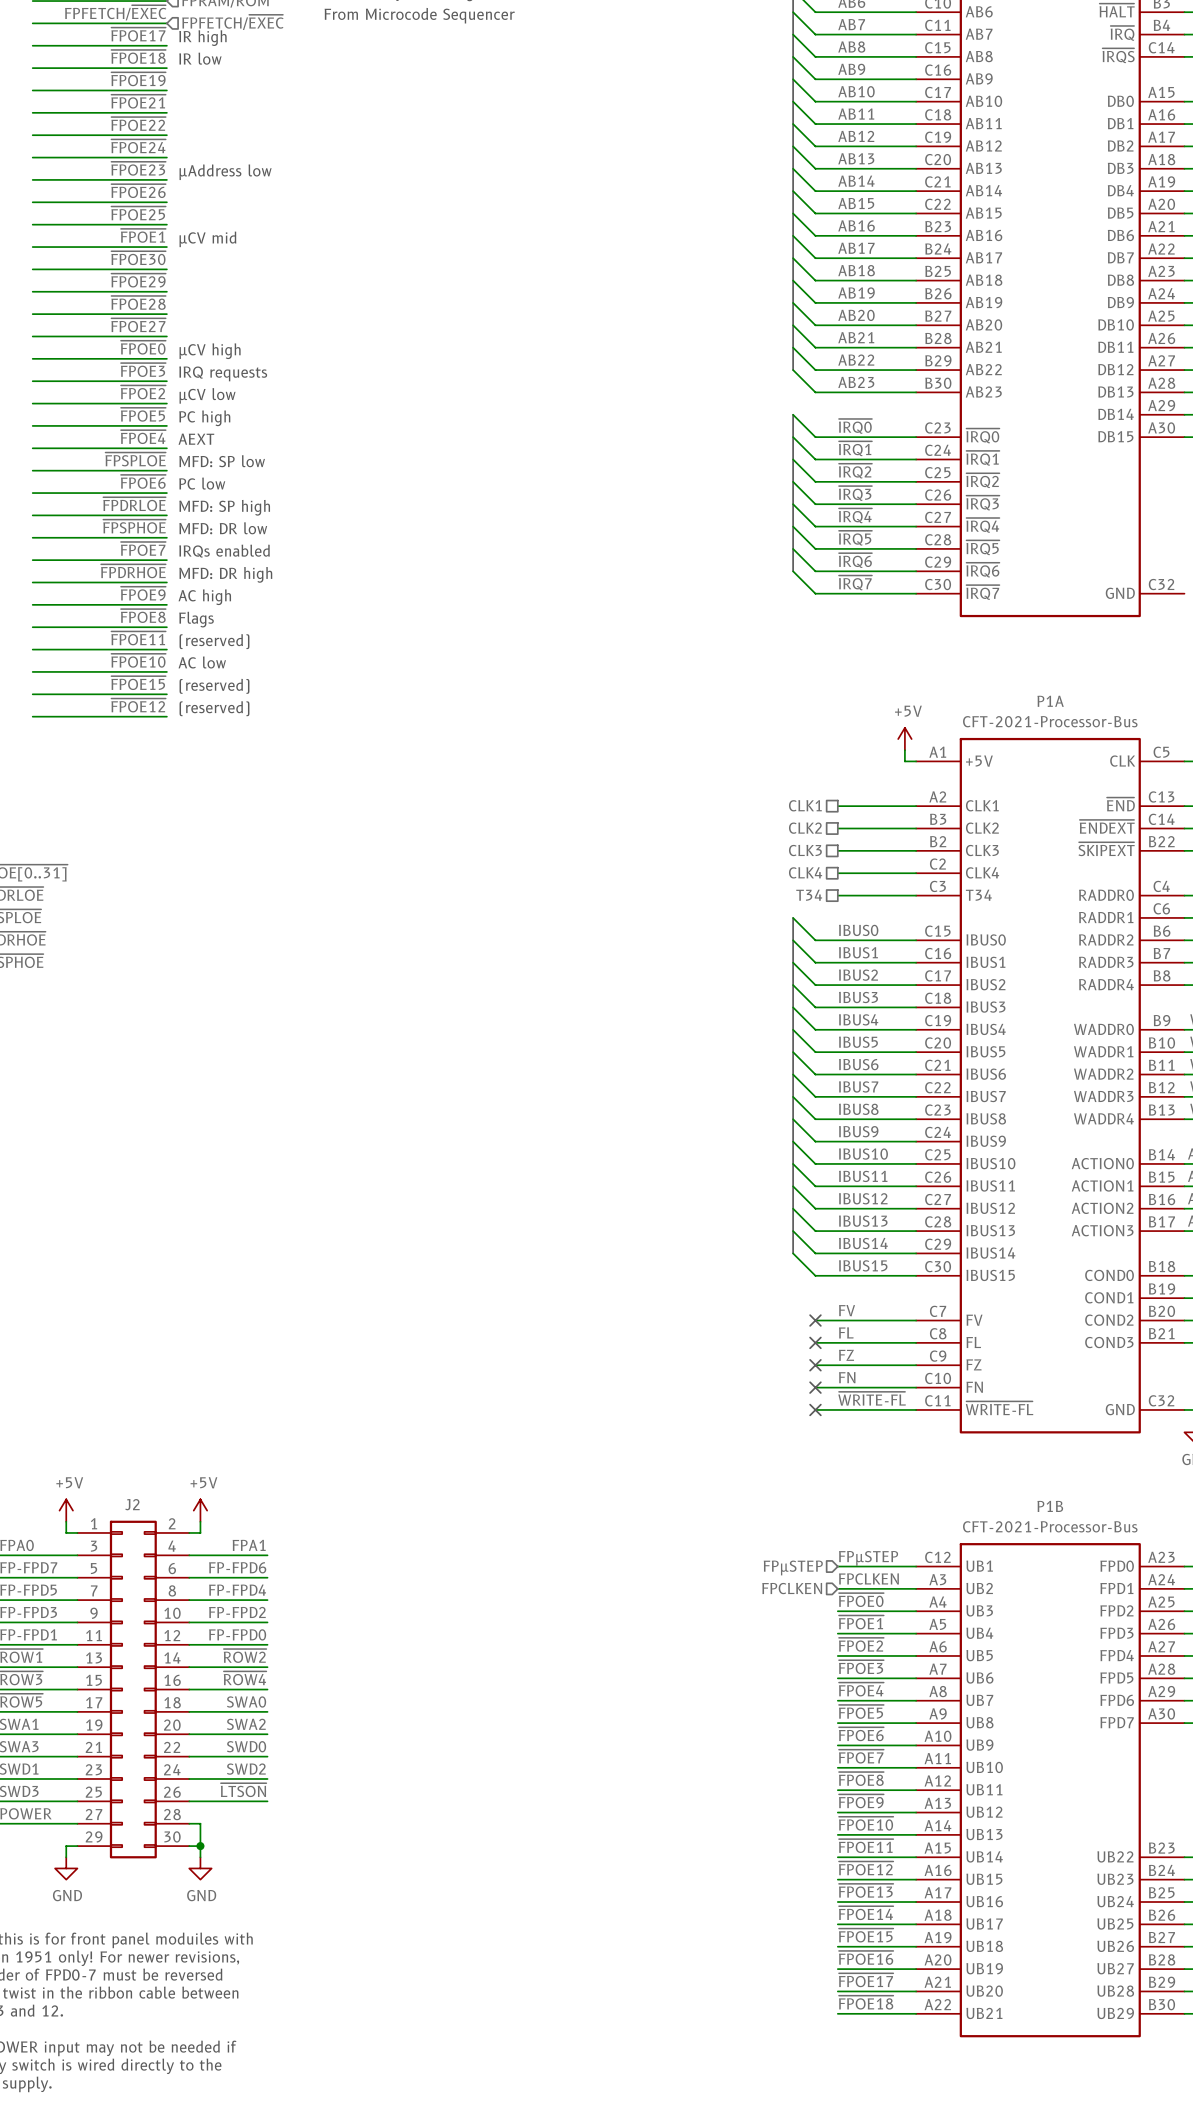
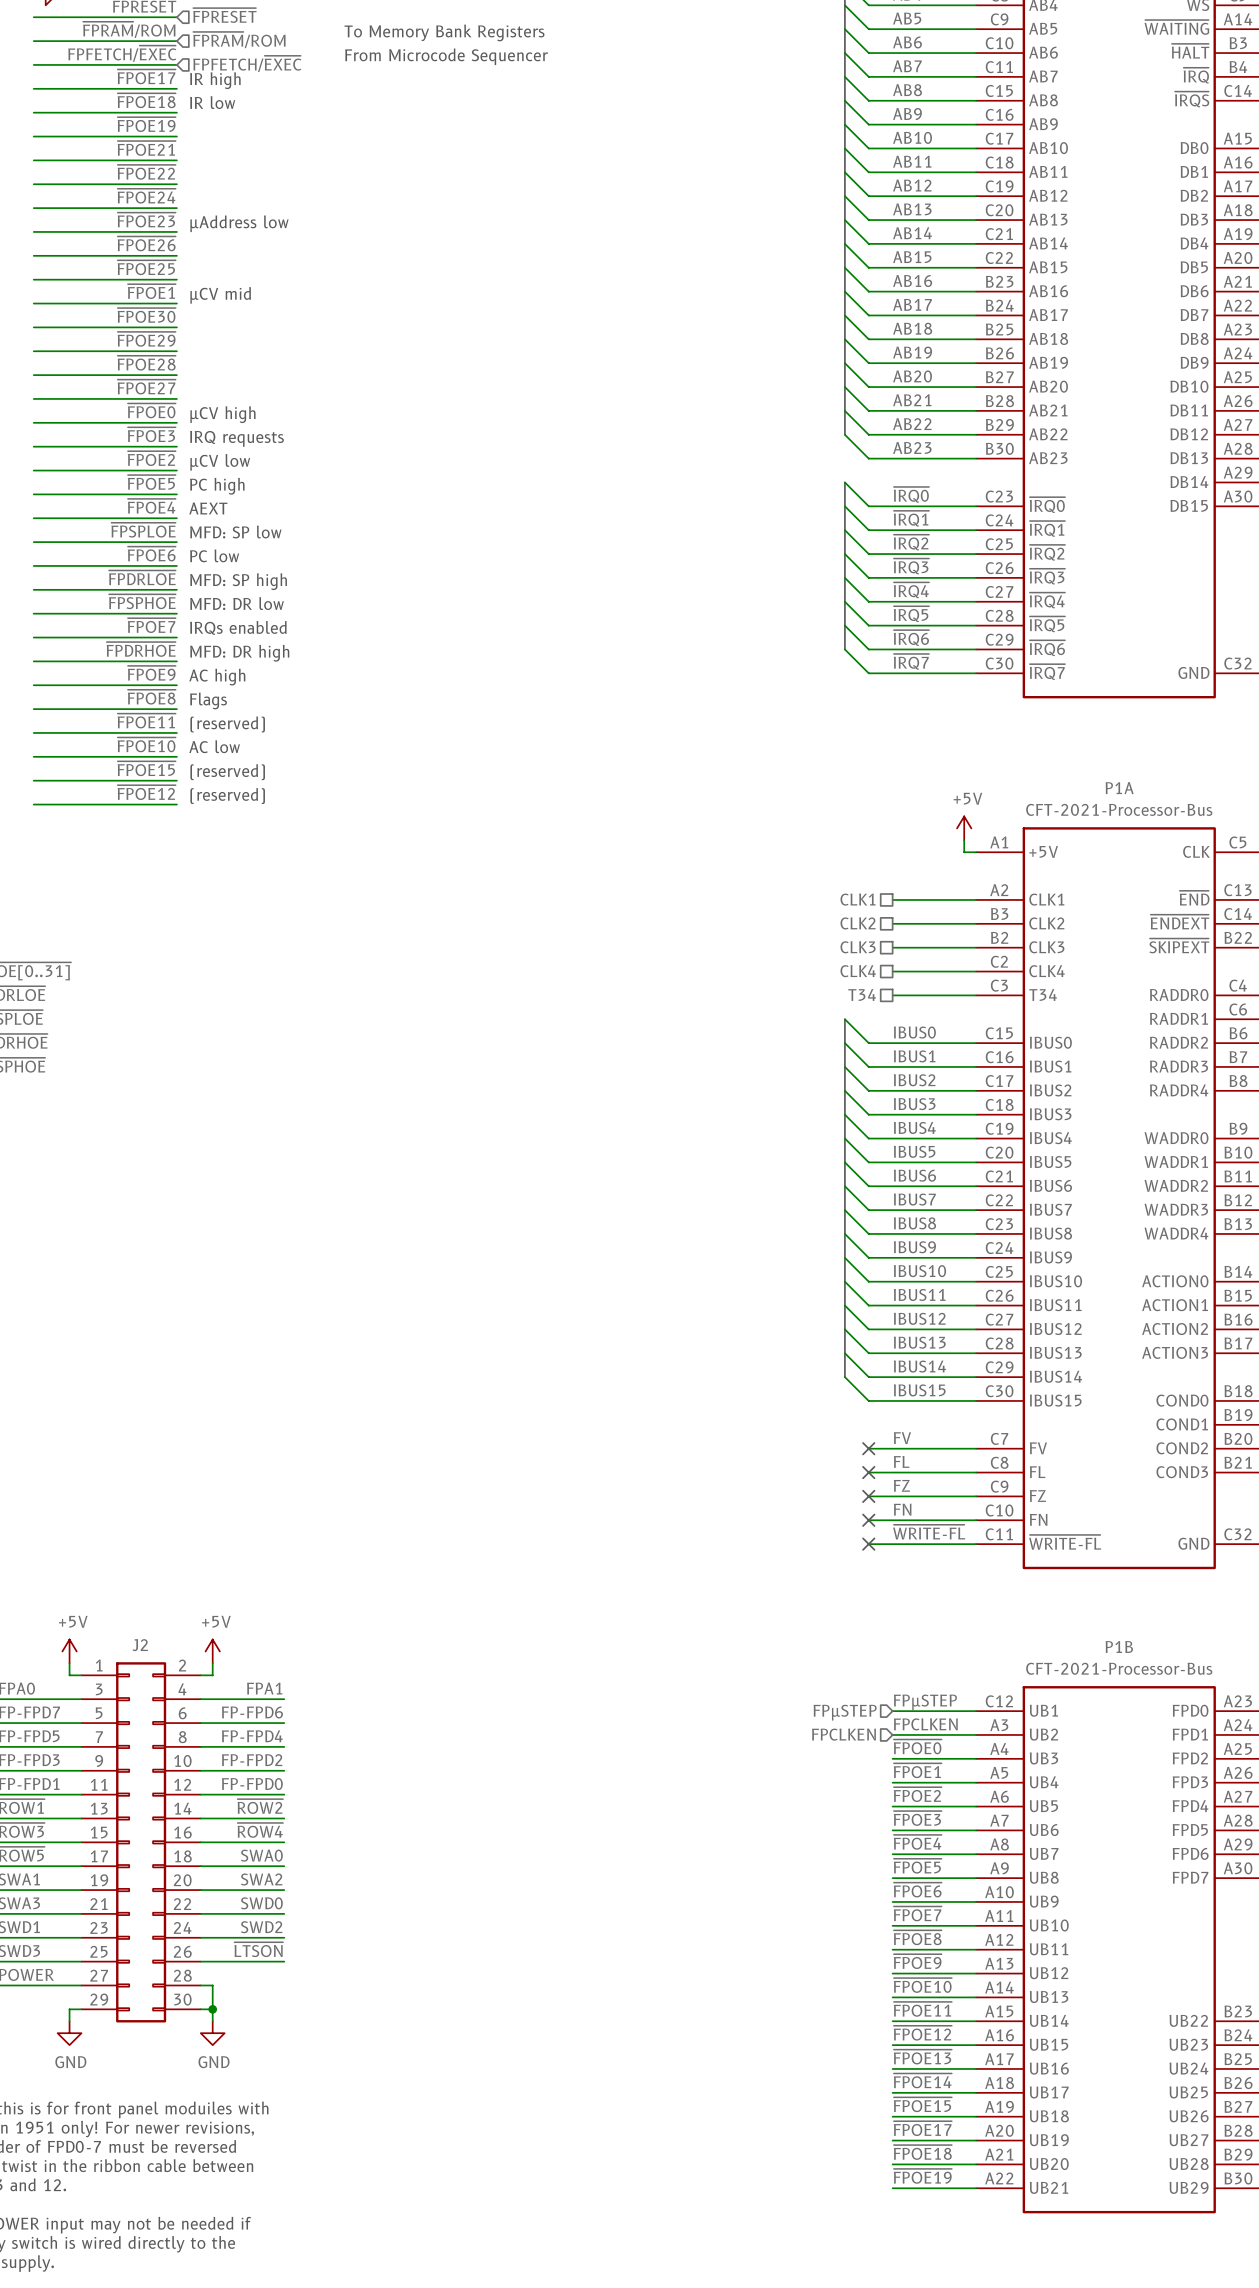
label: ~{FPOE16} (866, 1957) -> ~{FPOE17} (922, 2128)
label: ~{FPOE17} (866, 1980) -> ~{FPOE18} (922, 2152)
label: ~{FPOE18} (866, 2002) -> ~{FPOE19} (922, 2176)

